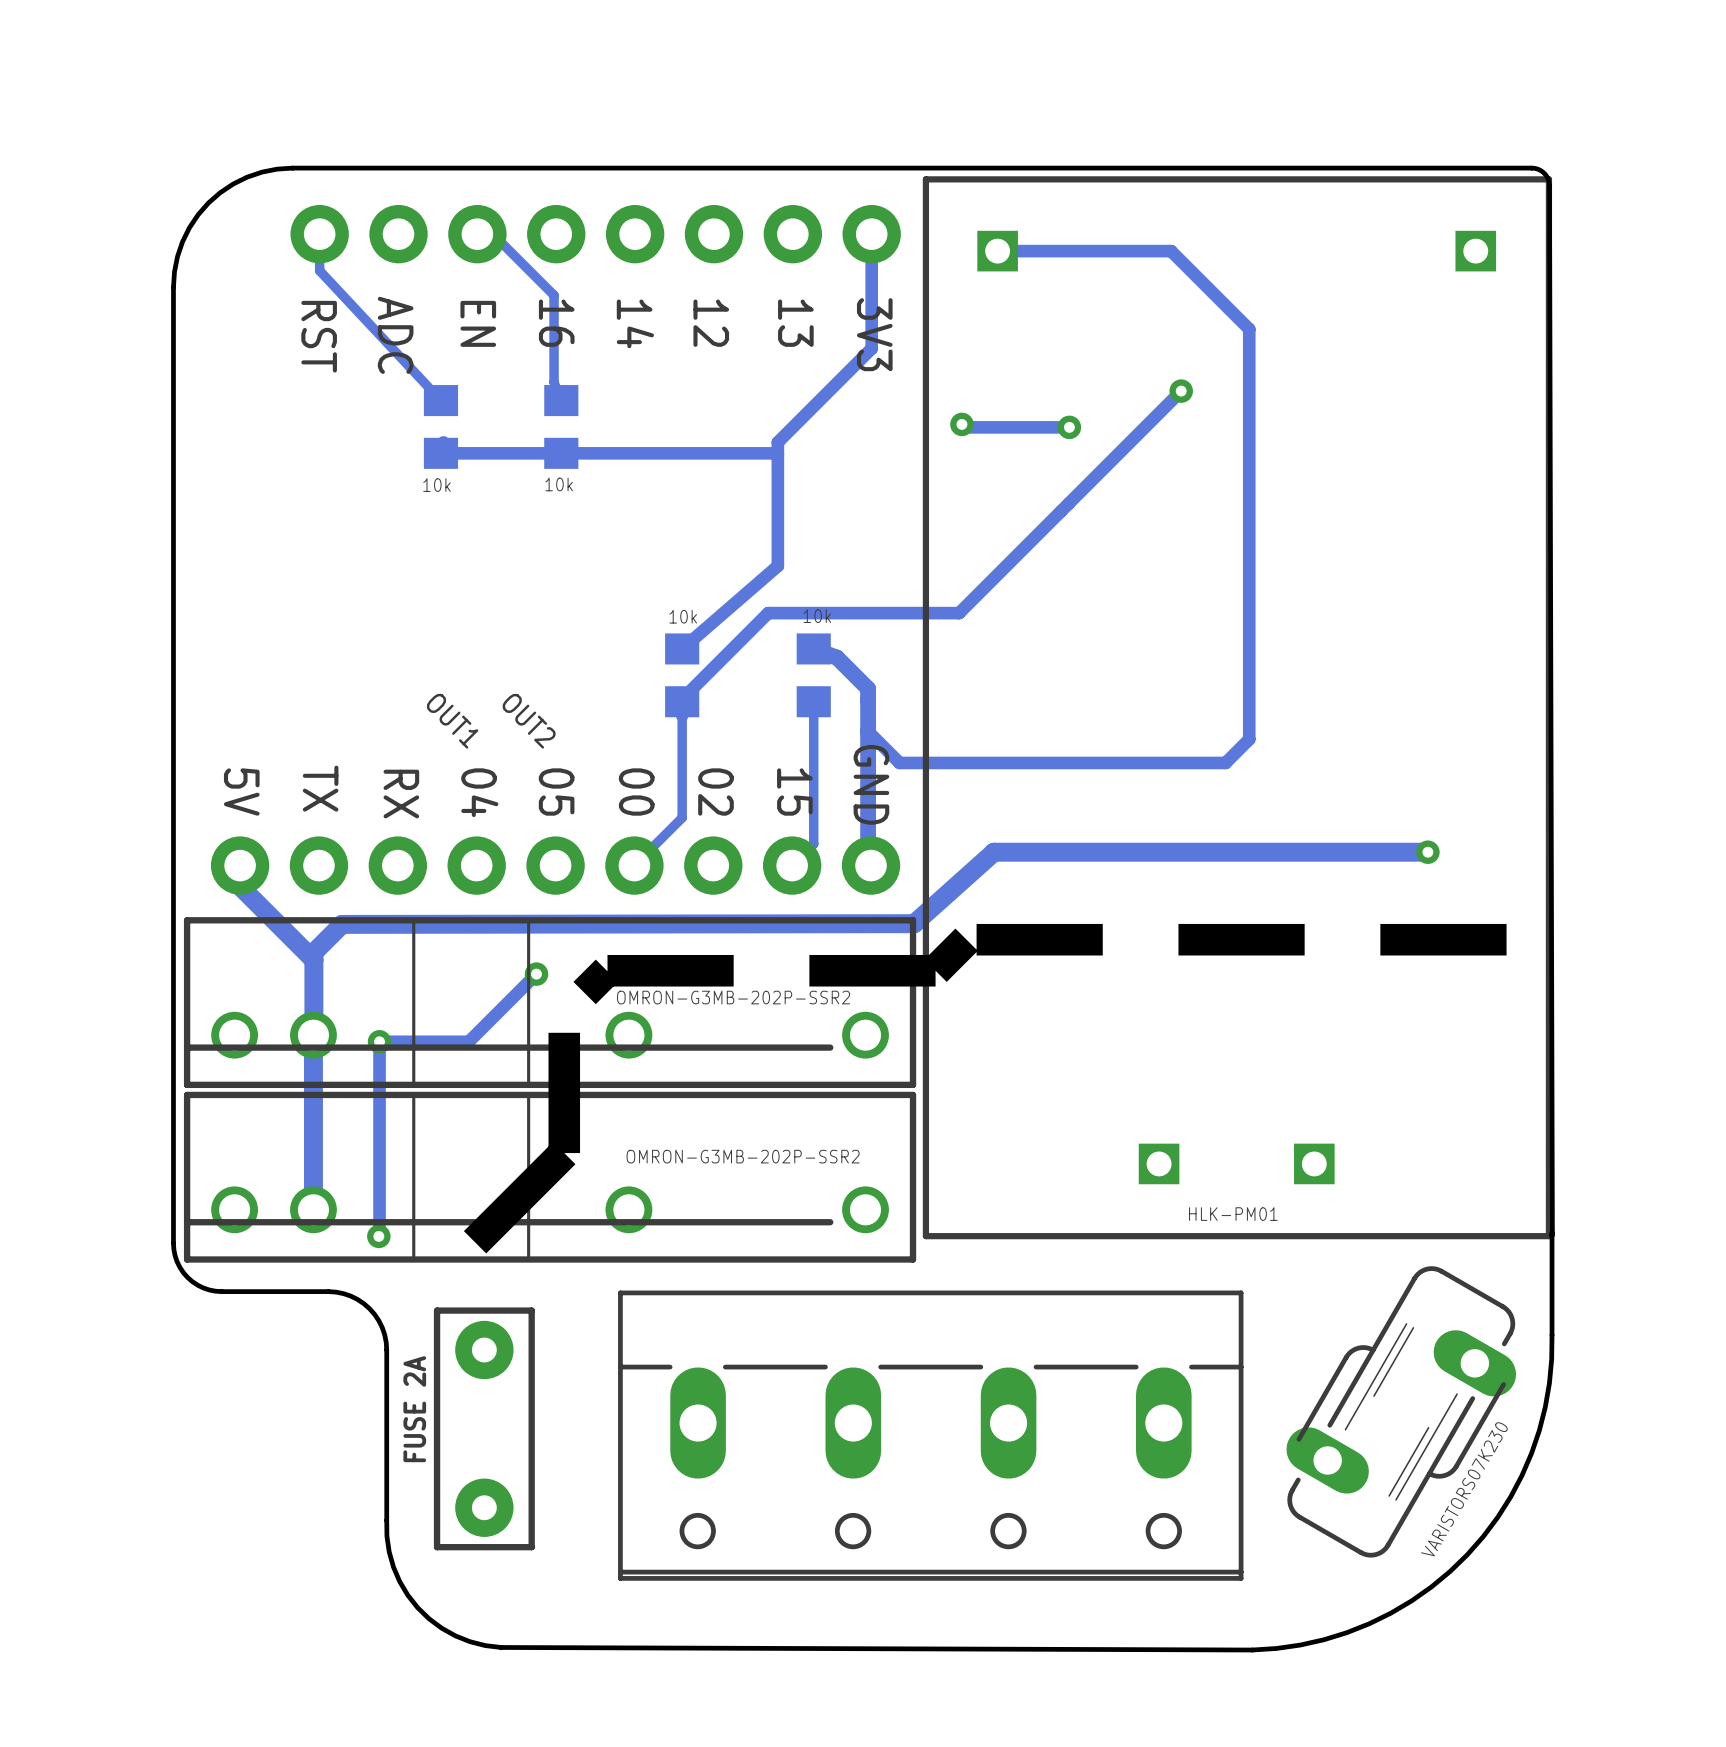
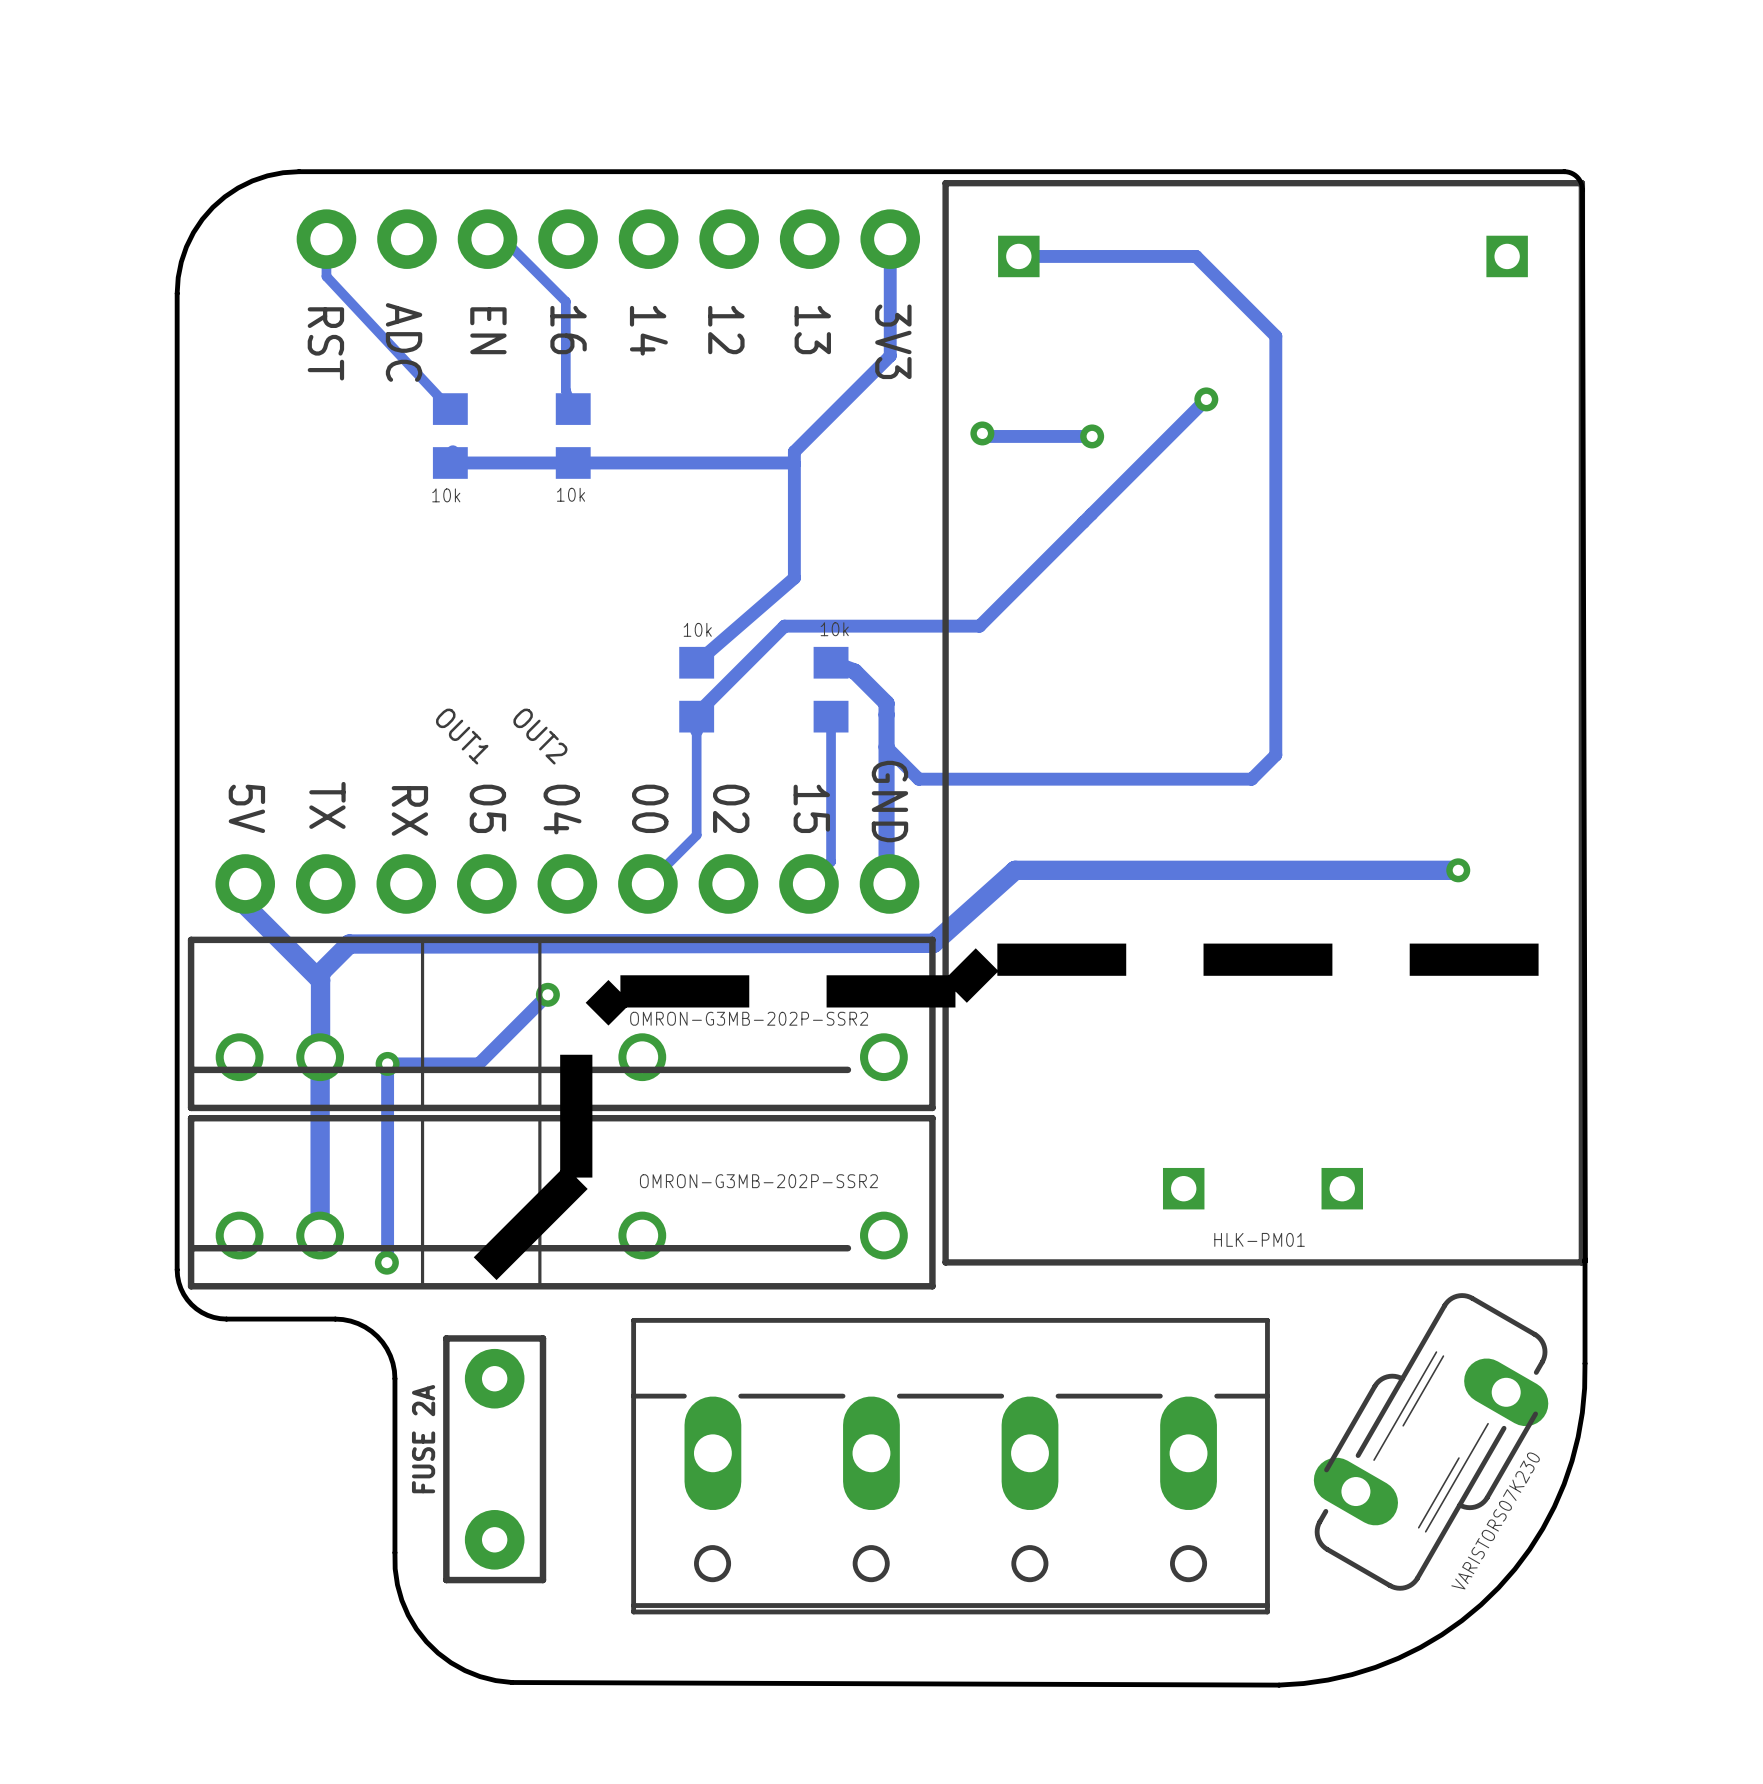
text: 04 (479, 792) -> 05 (487, 808)
text: 05 (556, 792) -> 04 (562, 809)

